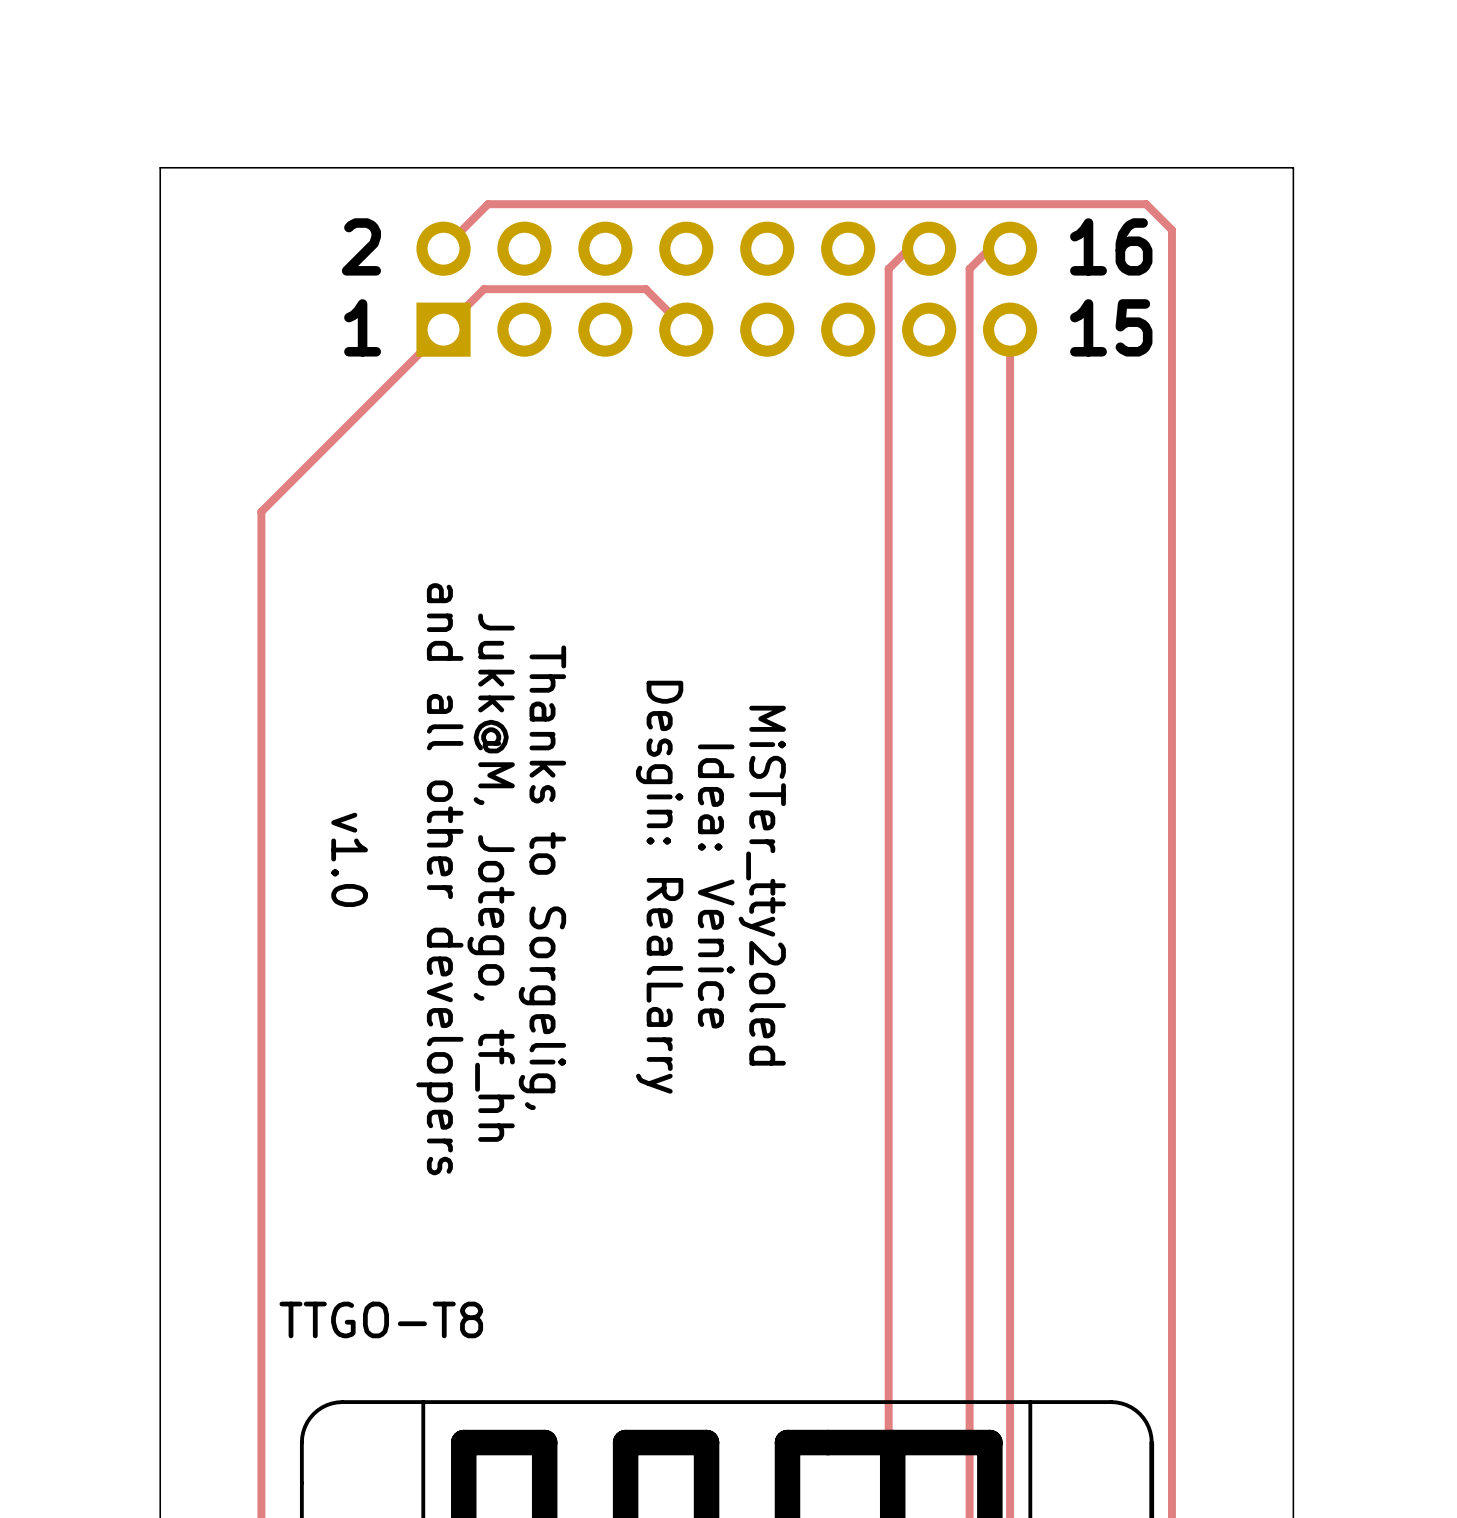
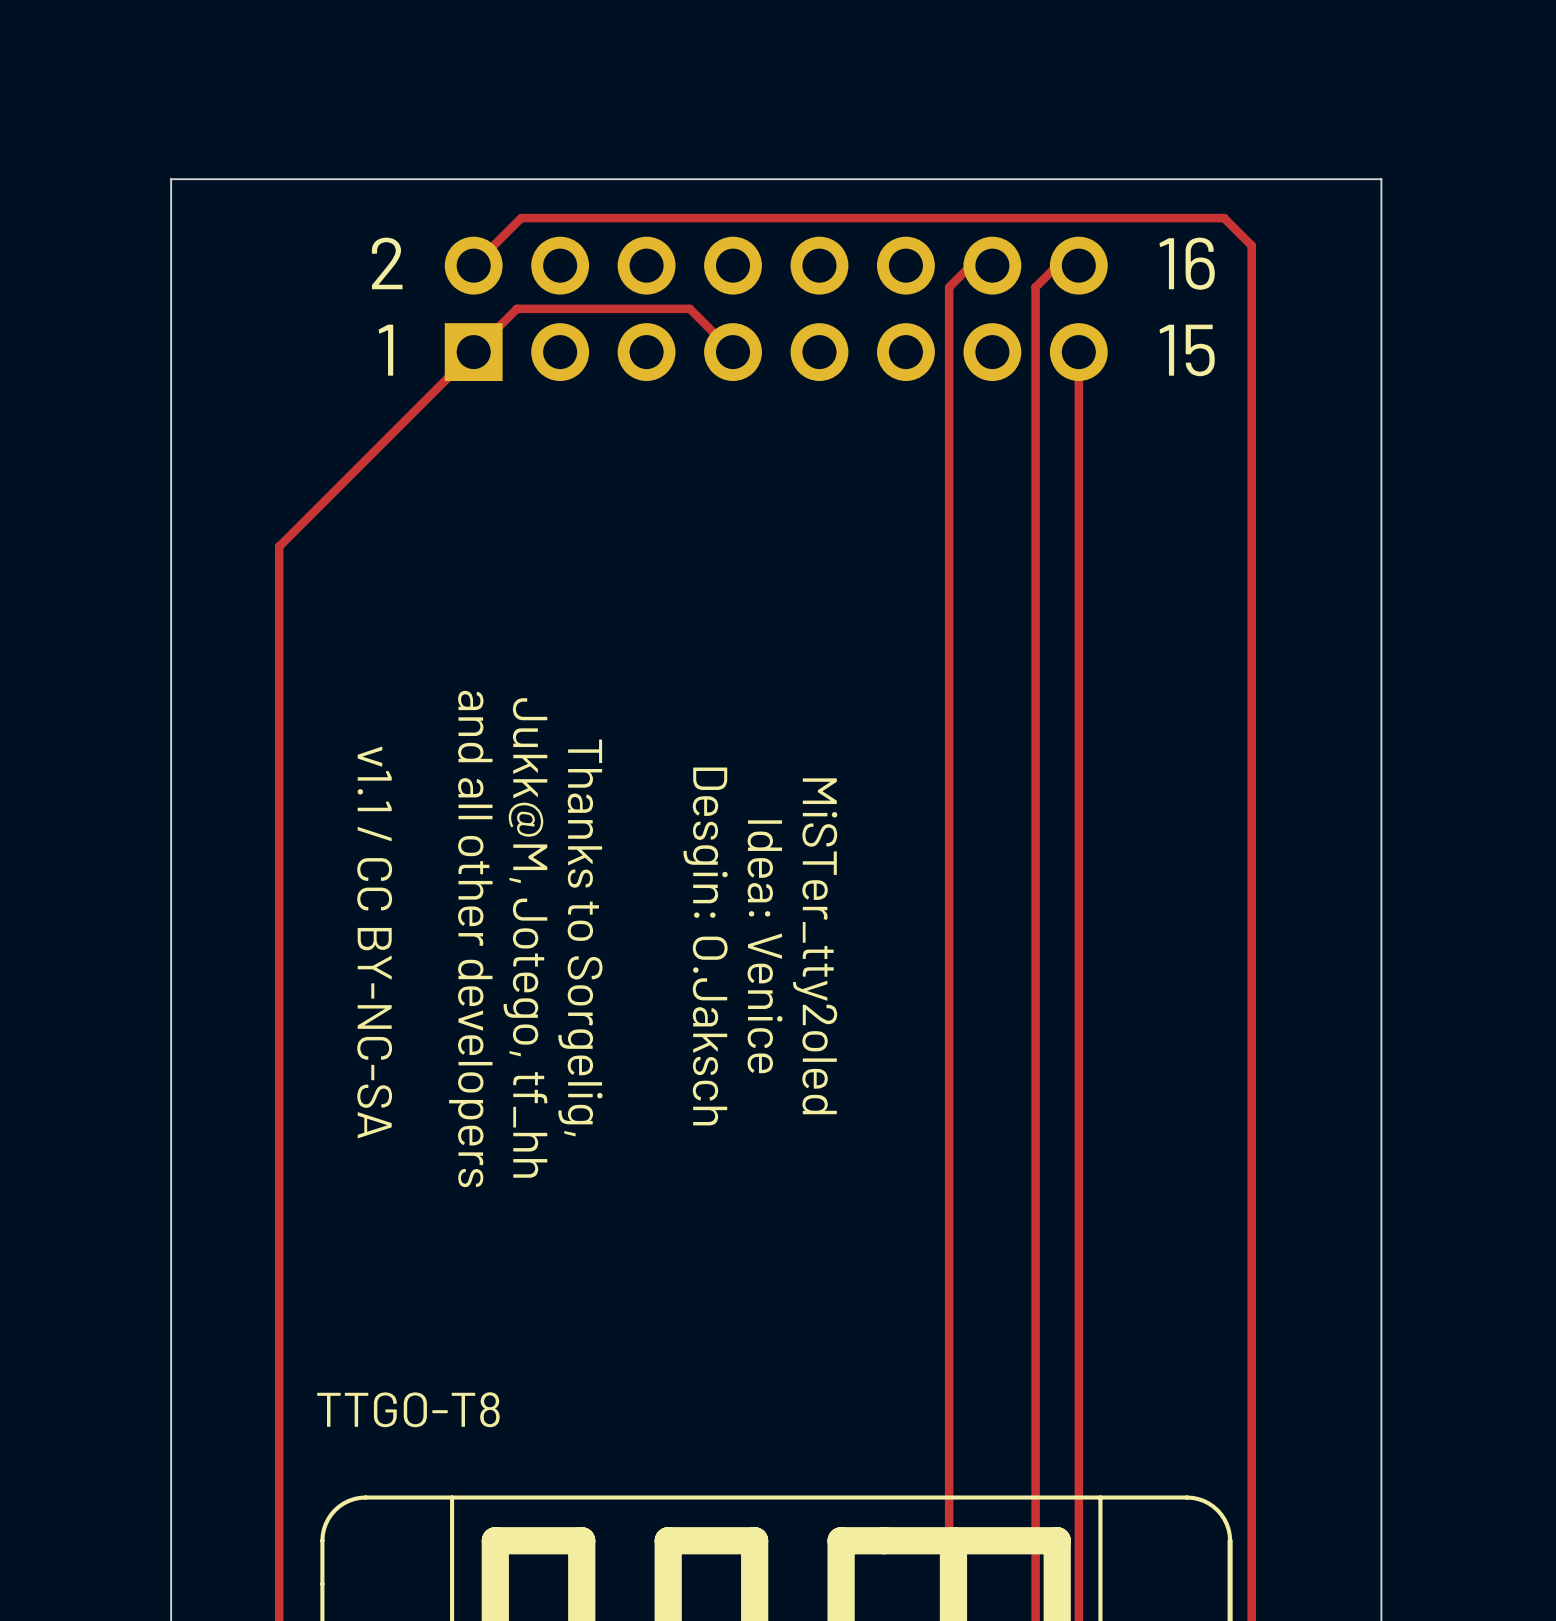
text: v1.0 (349, 859) -> v1.1 / CC BY-NC-SA (374, 942)
text: Desgin: RealLarry (659, 887) -> Desgin: O.Jaksch (705, 946)

